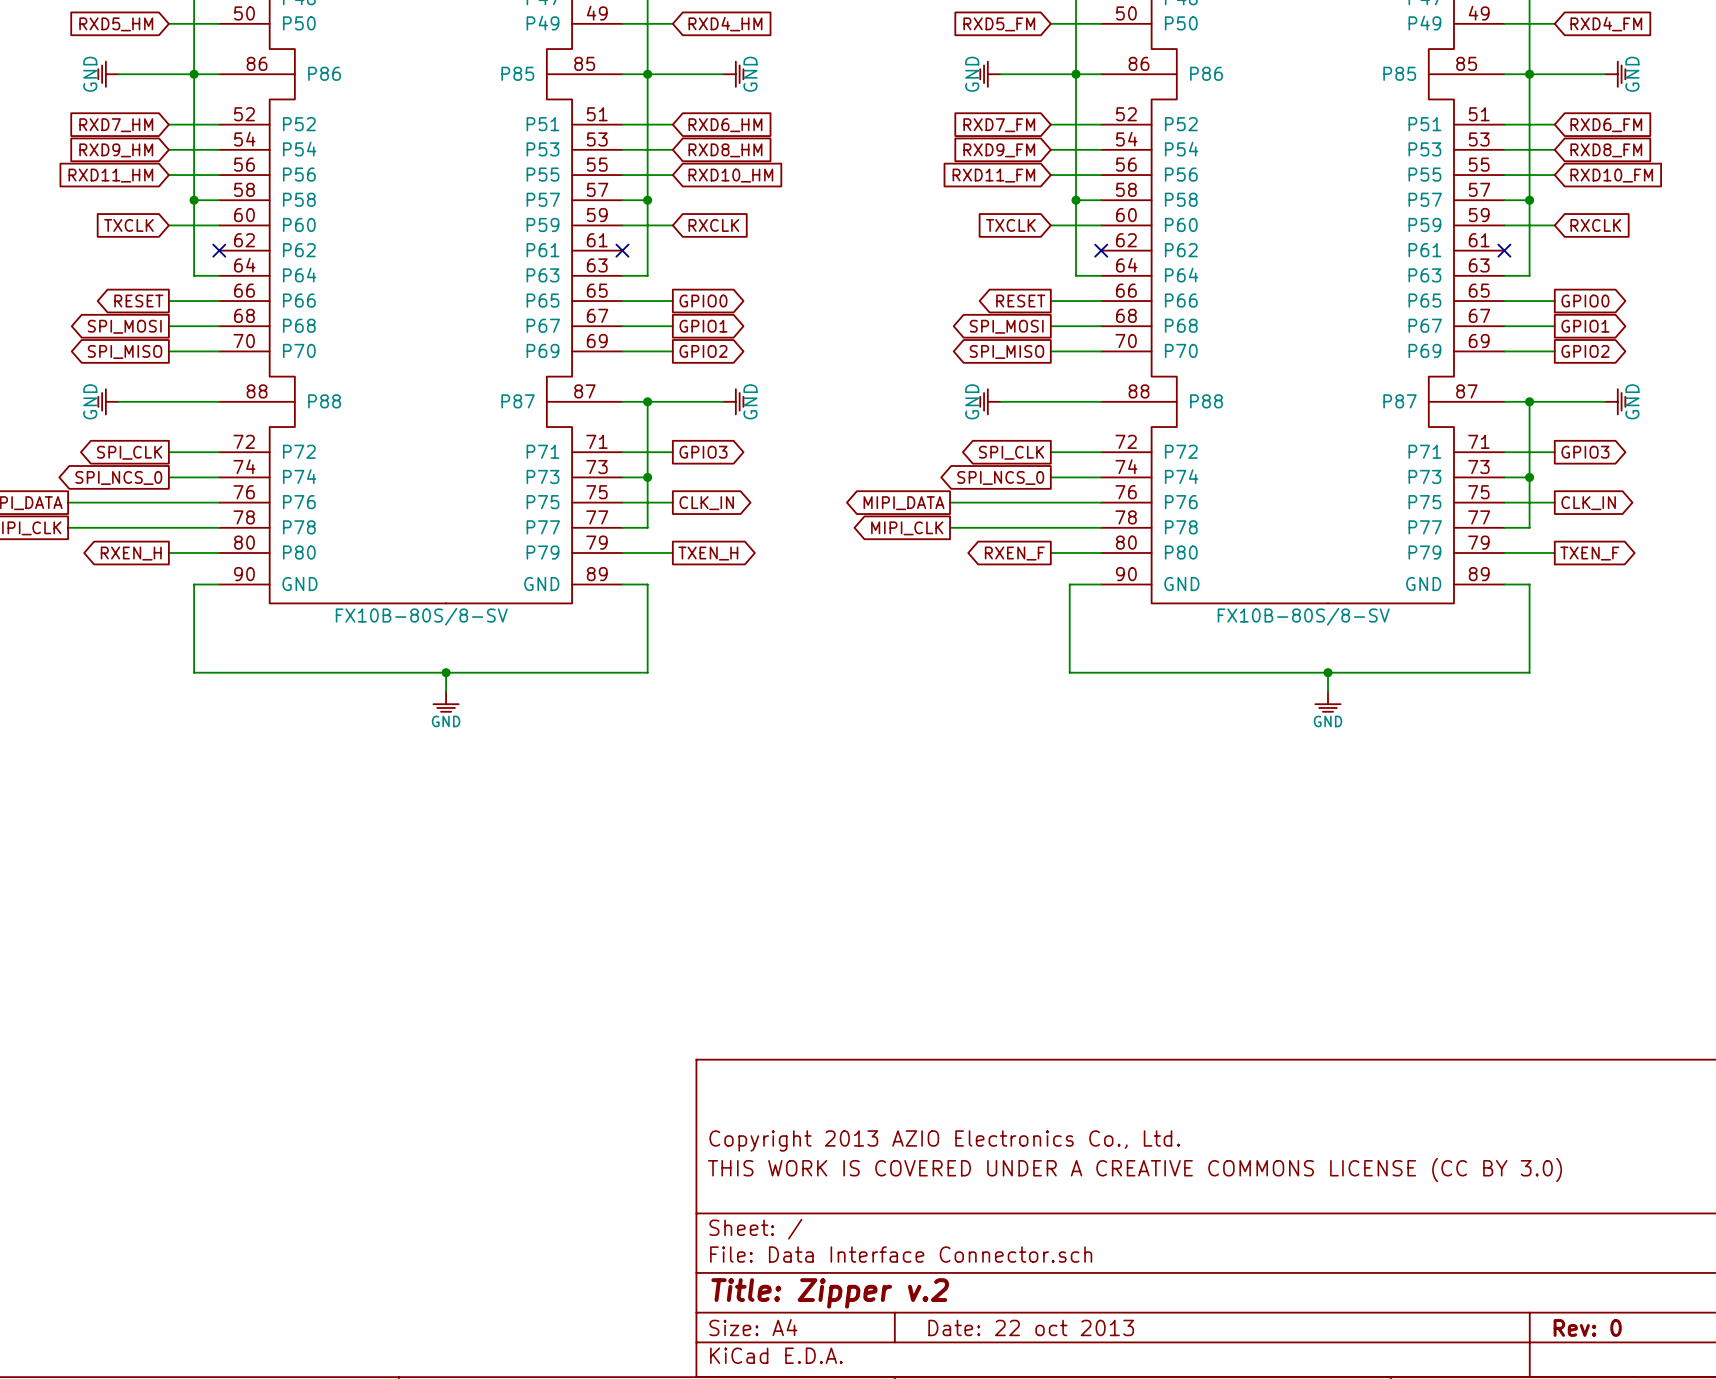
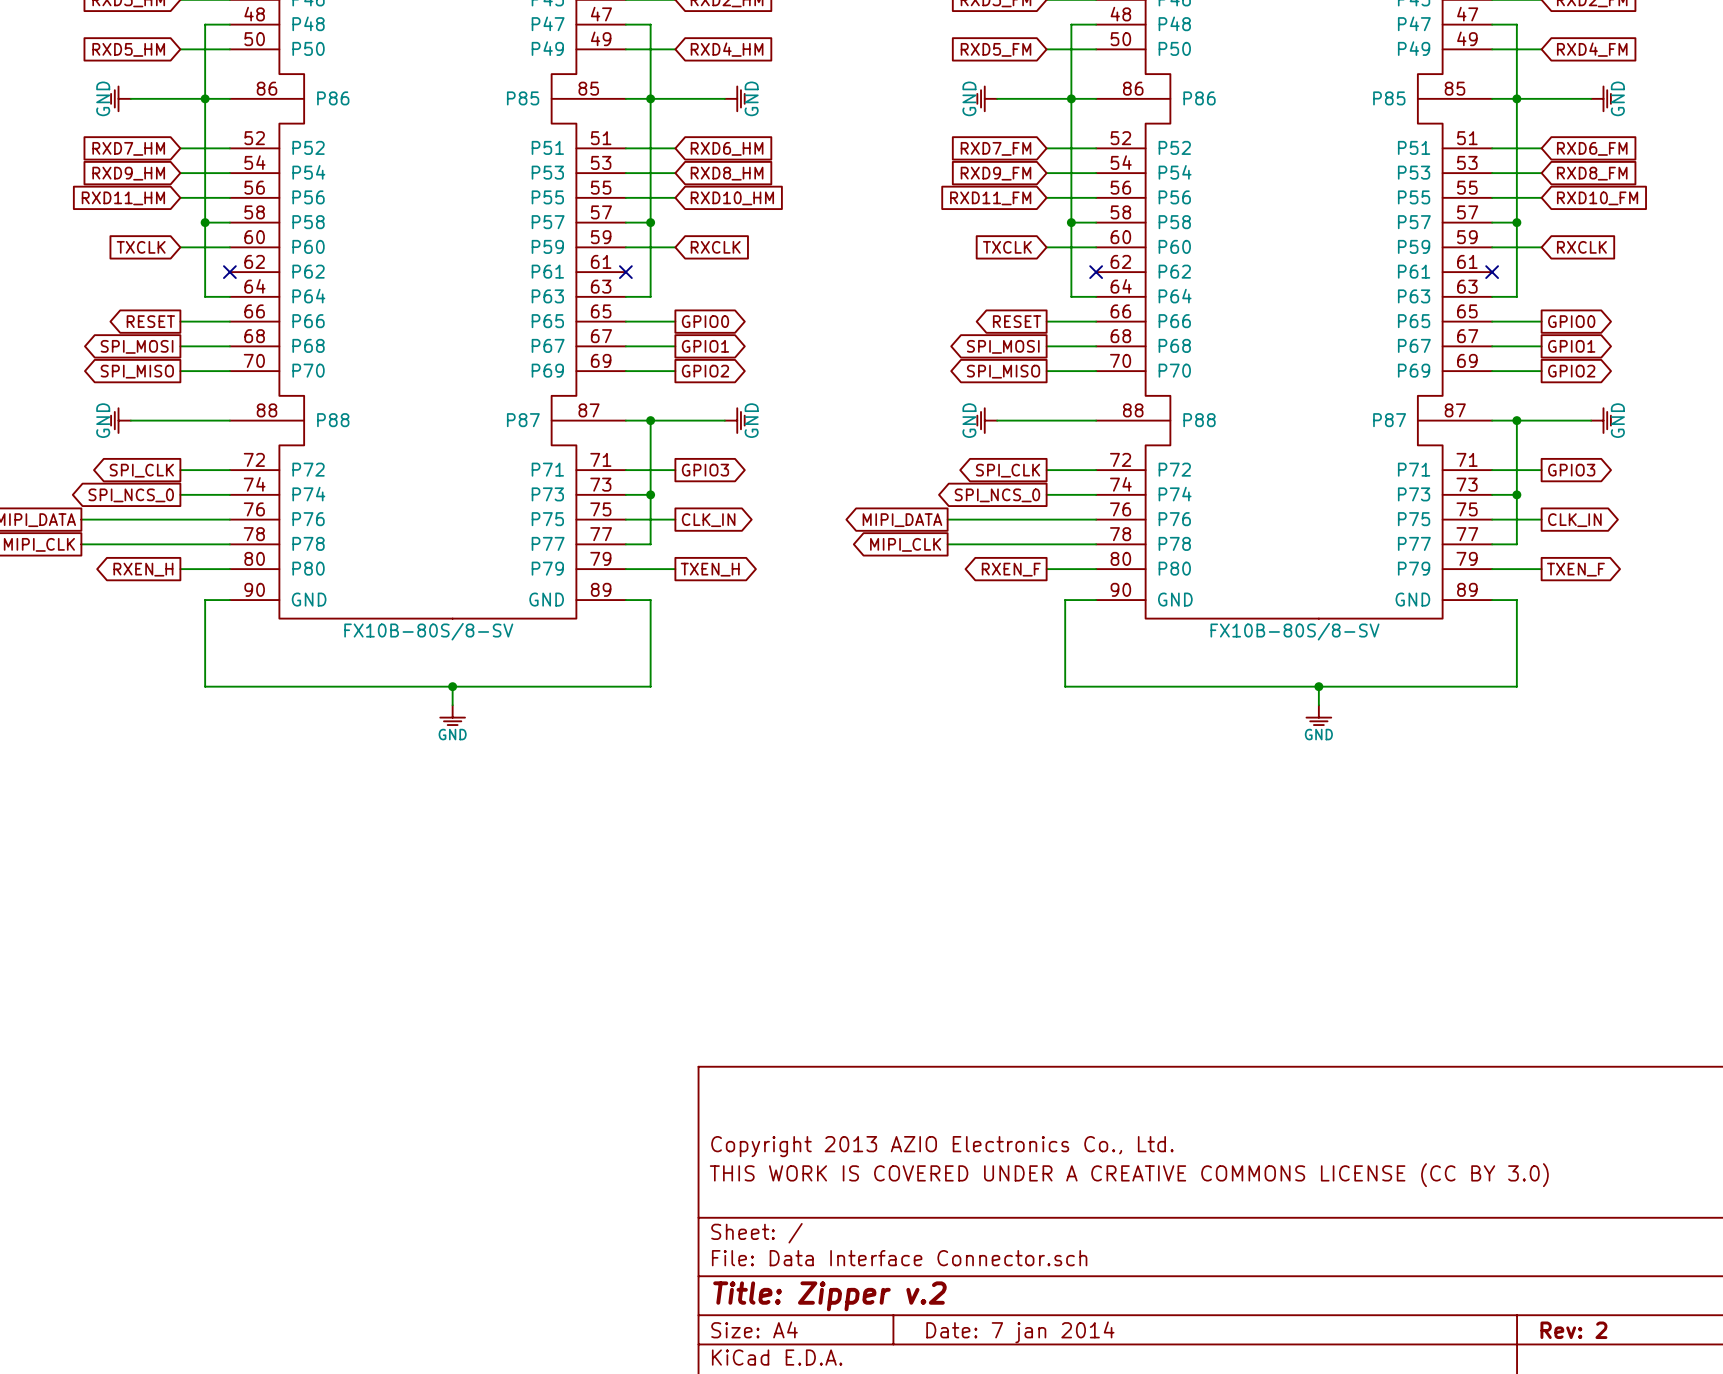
title block: Date: 22 oct 2013 (1031, 1327) -> Date: 7 jan 2014 (1020, 1332)
title block: Rev: 0 (1587, 1327) -> Rev: 2 (1573, 1330)

